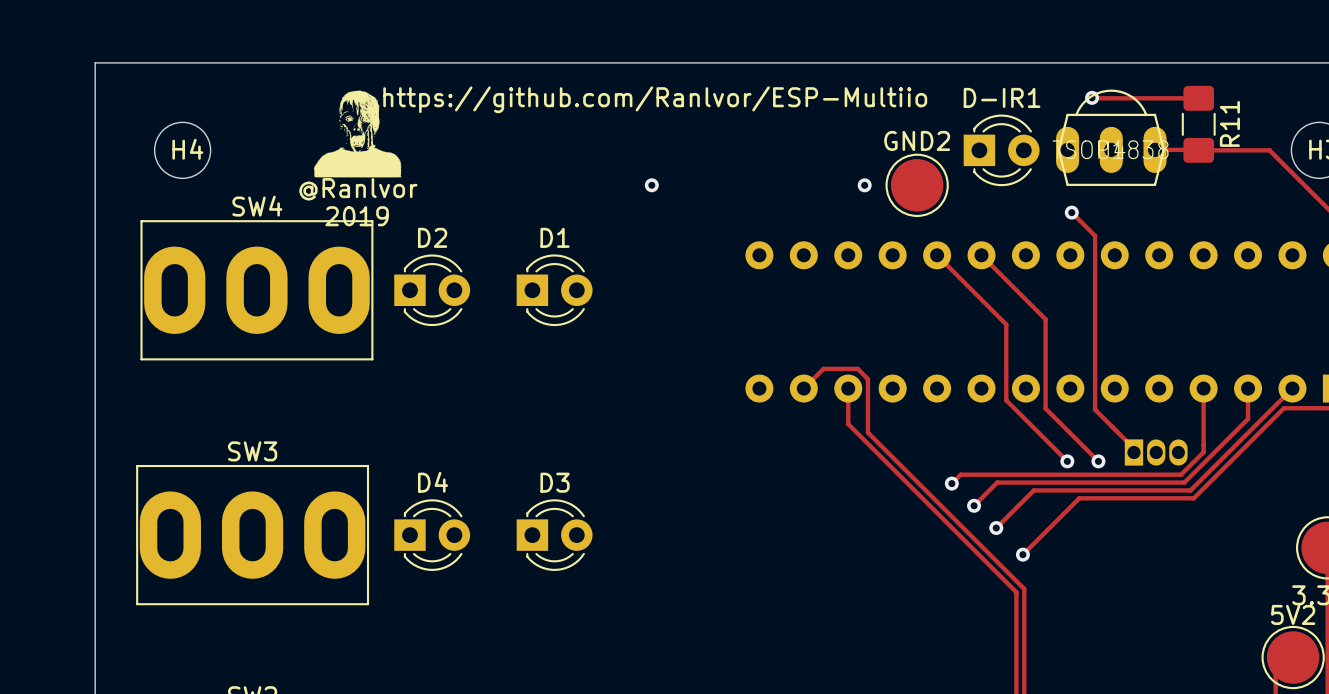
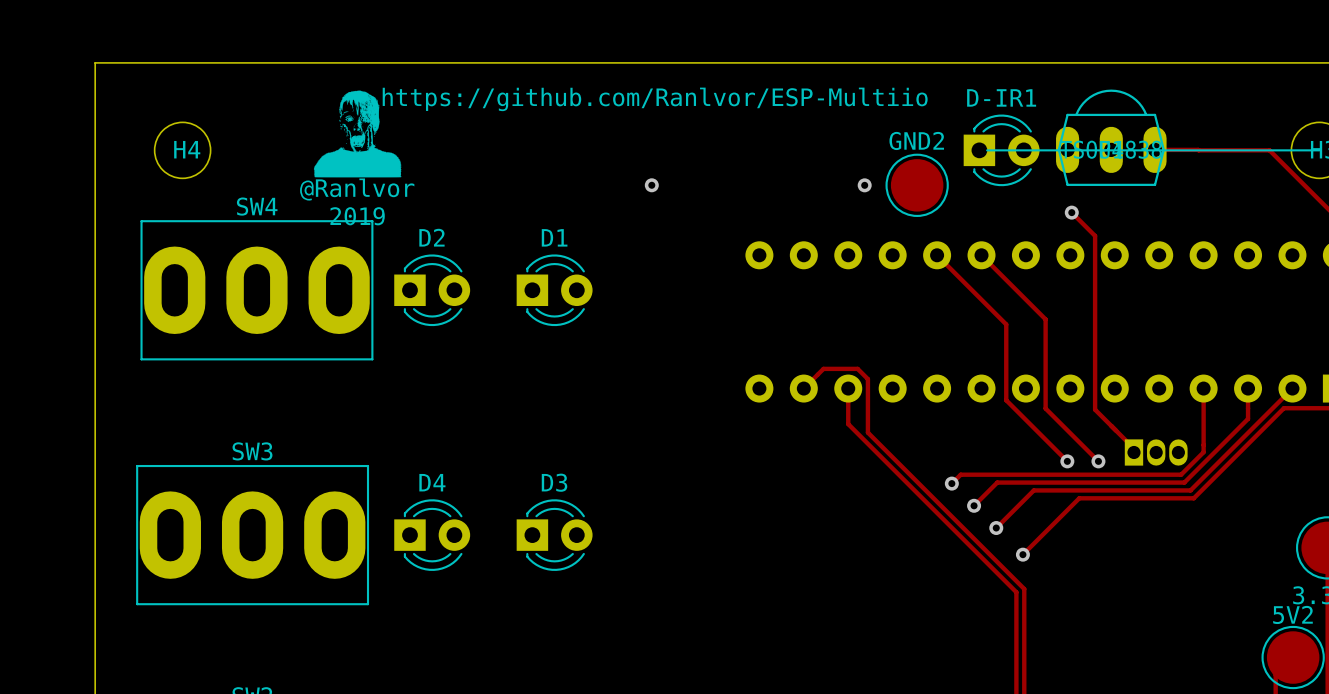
track: (1092, 97) (1198, 98) -> none
via: (1092, 97) -> none
R11: (1198, 124) -> none
line: none -> (987, 150) (1319, 150)

